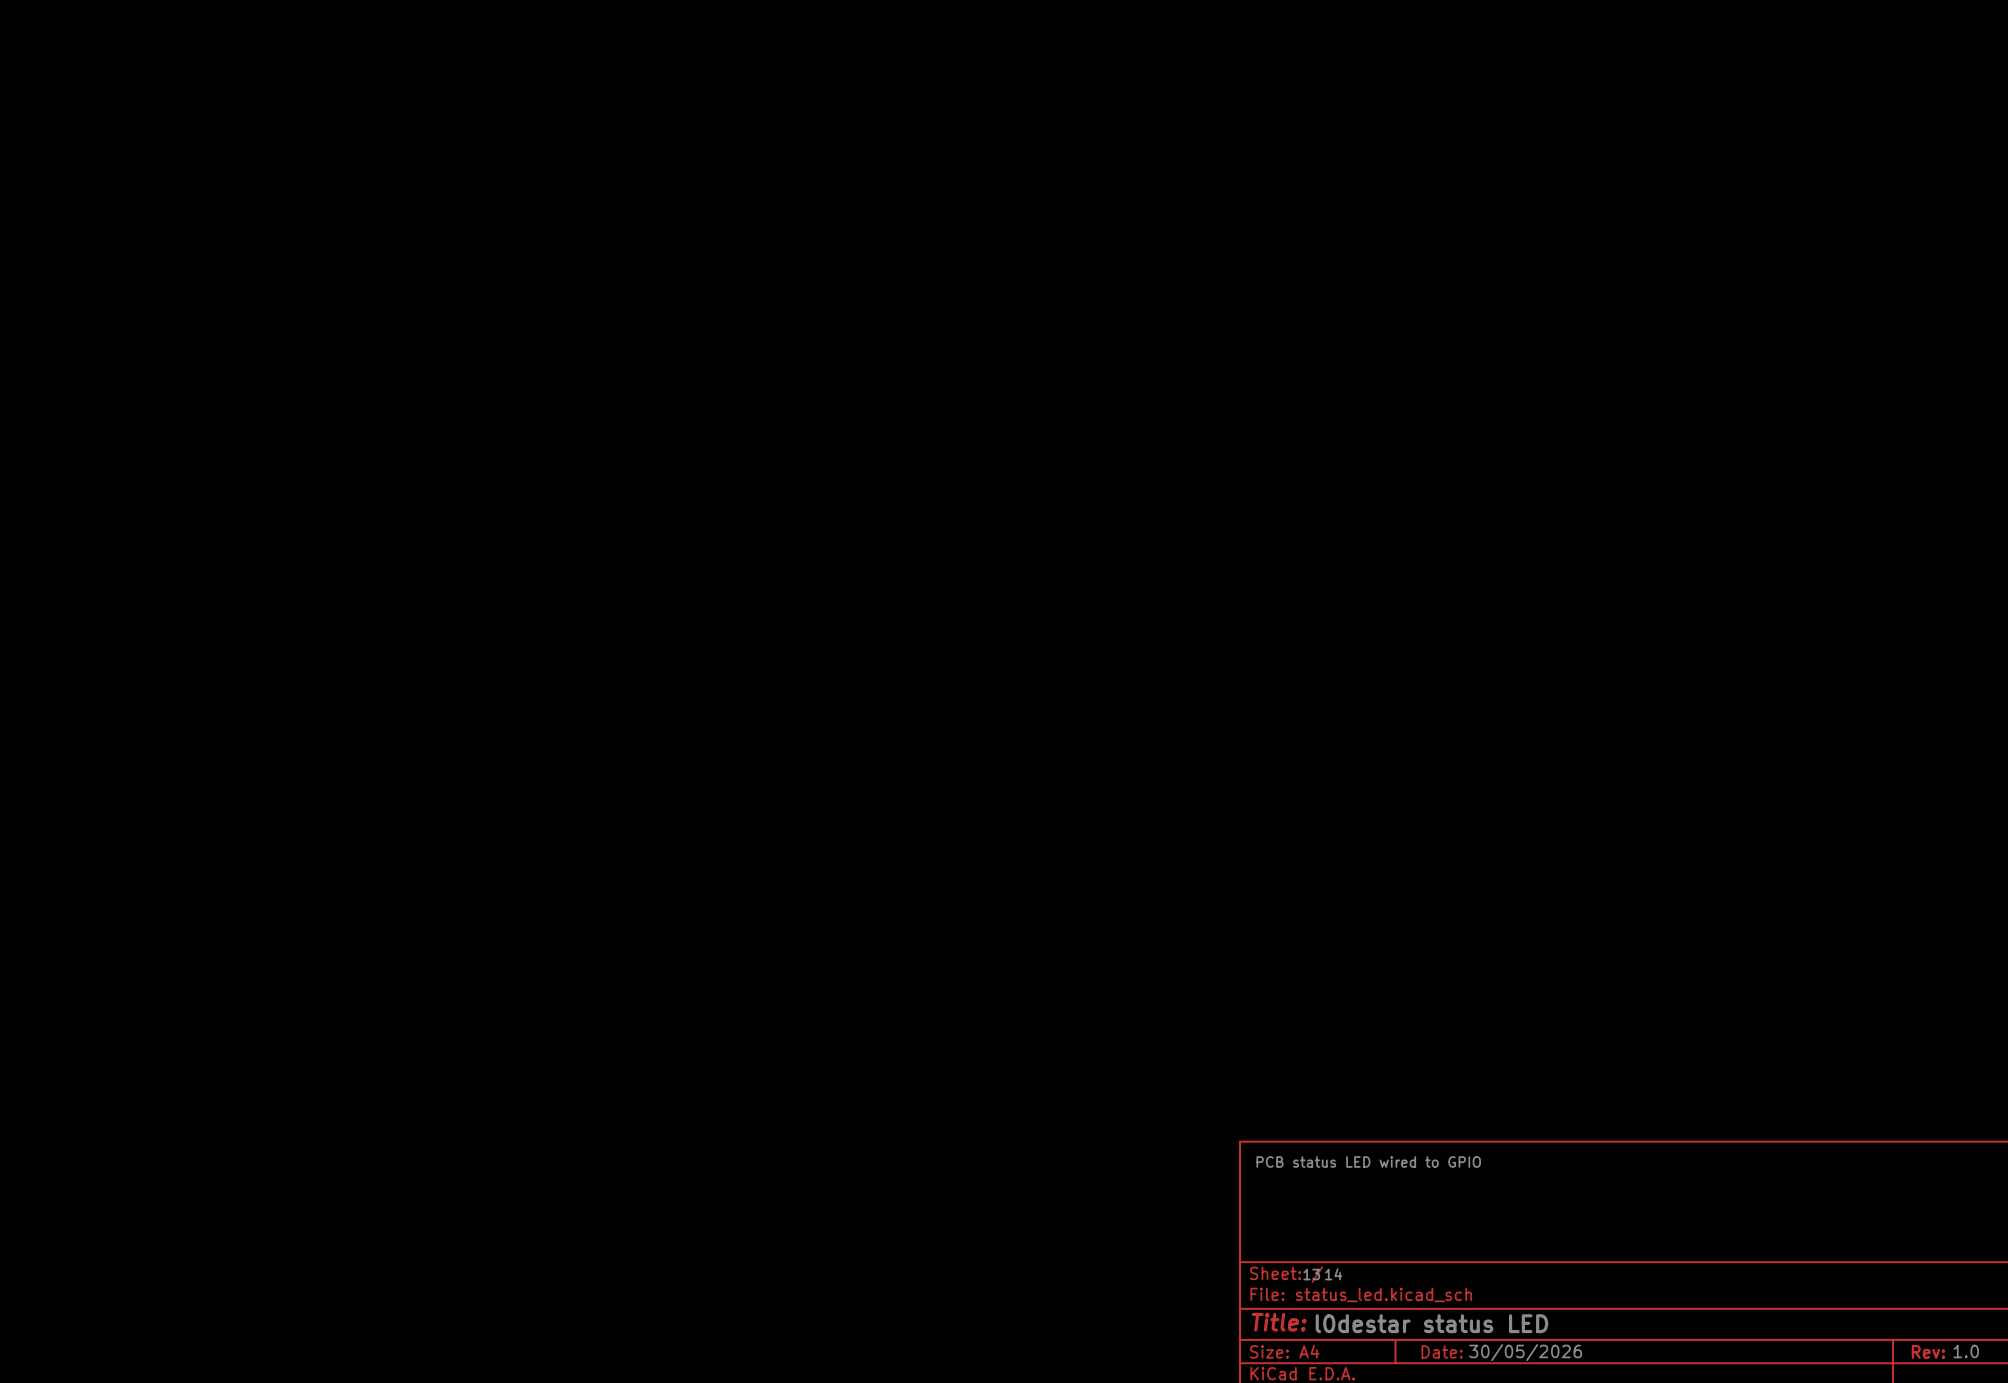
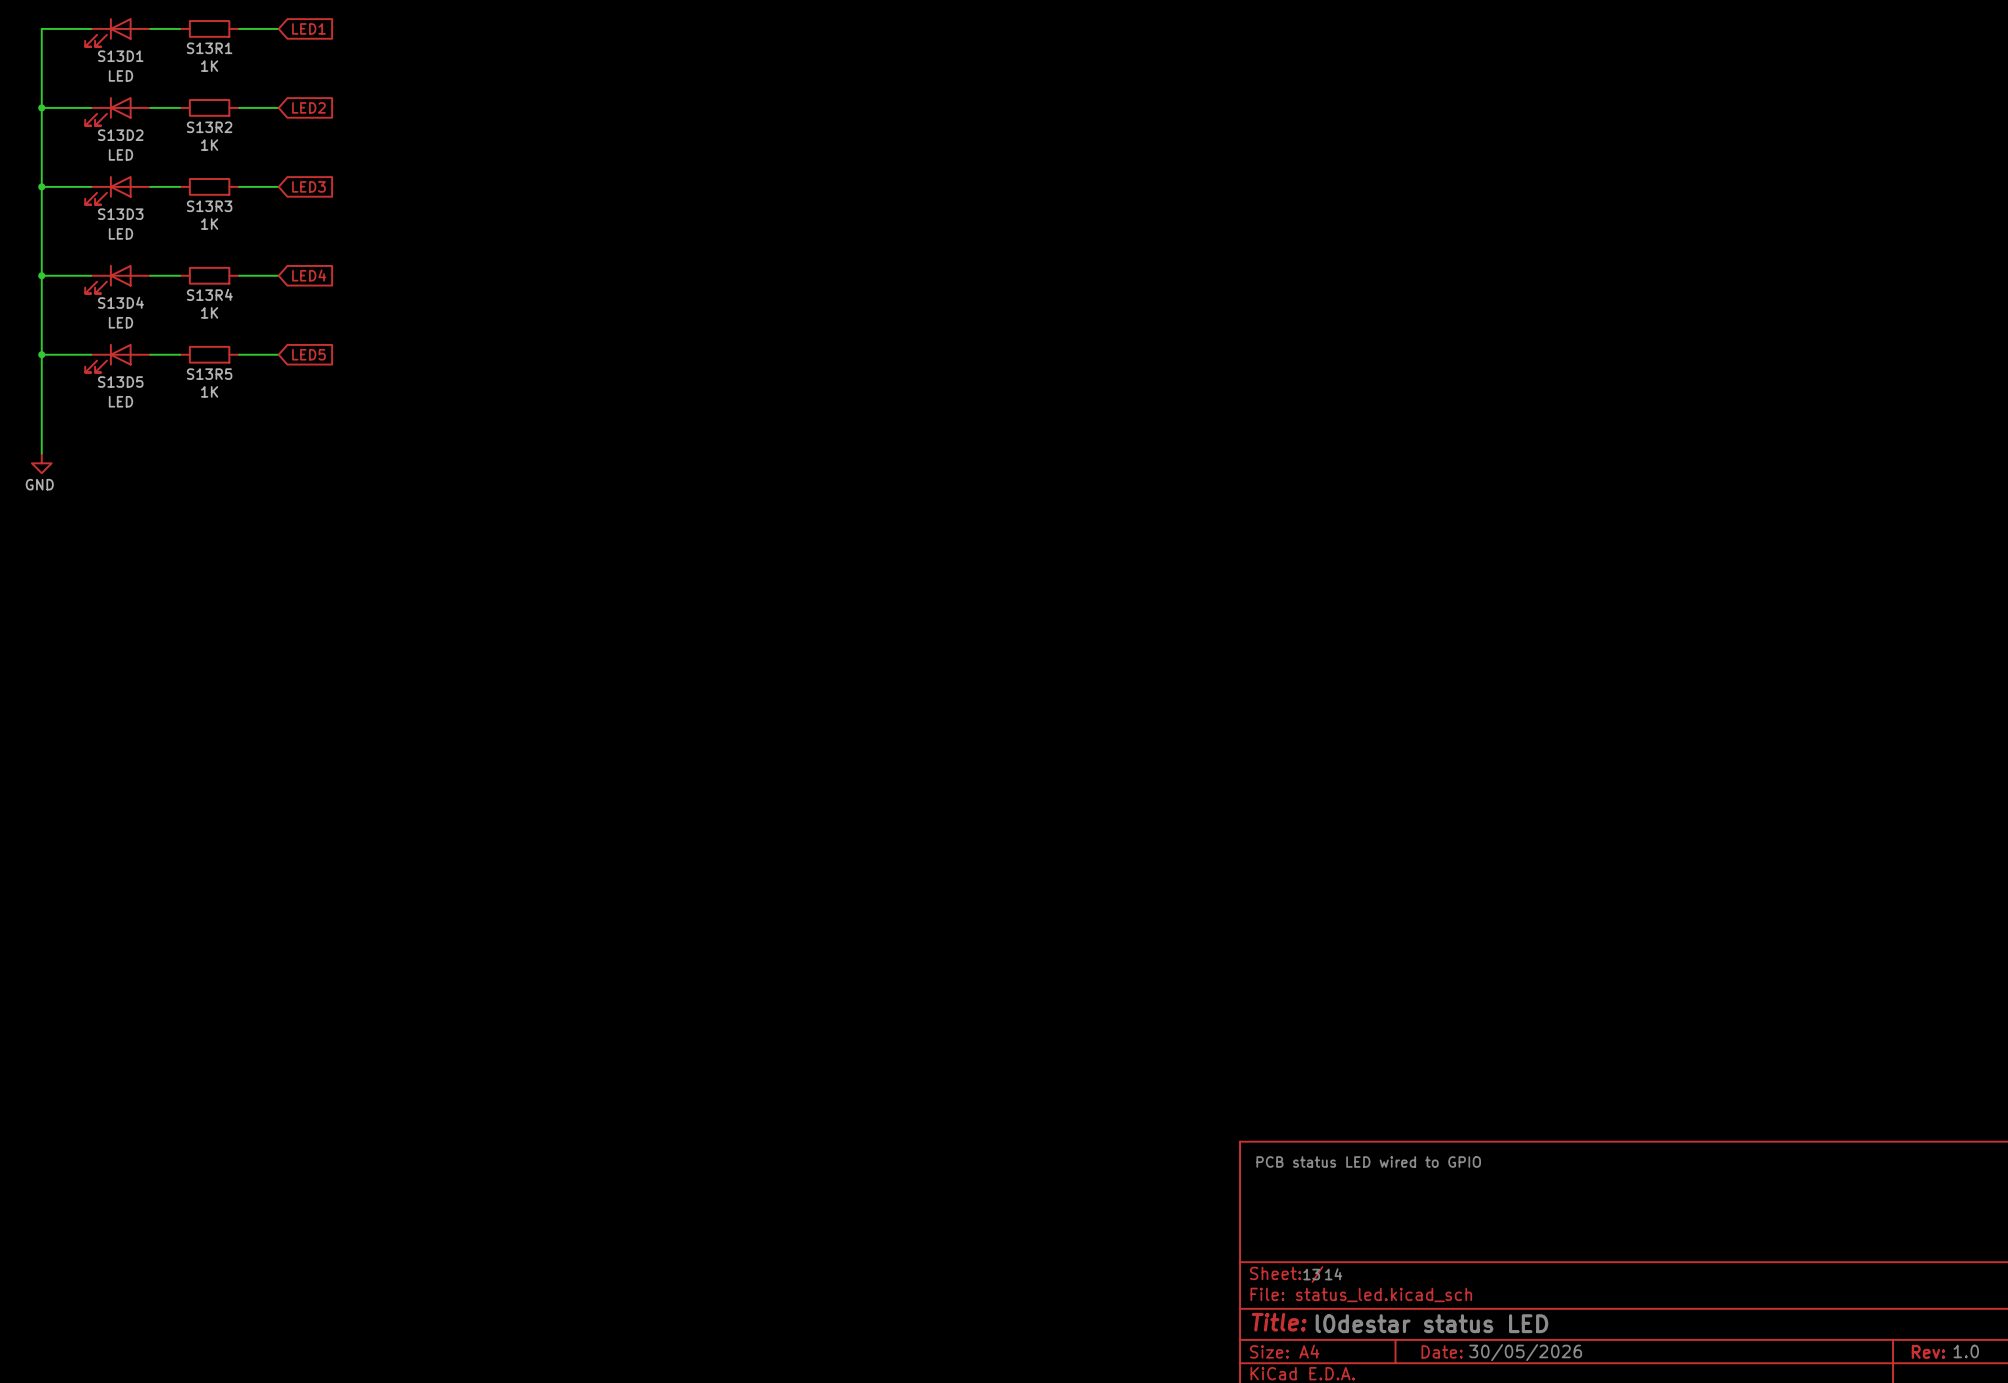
wire: none -> (91, 28) (41, 28) (41, 453)
wire: none -> (150, 28) (179, 28)
S13R1: none -> 1K (209, 28)
wire: none -> (239, 28) (278, 28)
global label: none -> LED1 (308, 28)
S13D1: none -> LED (117, 32)
wire: none -> (41, 107) (91, 107)
junction: none -> (41, 107)
wire: none -> (150, 107) (179, 107)
S13R2: none -> 1K (209, 107)
wire: none -> (239, 107) (278, 107)
global label: none -> LED2 (308, 107)
S13D2: none -> LED (117, 111)
wire: none -> (41, 186) (91, 186)
junction: none -> (41, 186)
wire: none -> (150, 186) (179, 186)
S13R3: none -> 1K (209, 186)
wire: none -> (239, 186) (278, 186)
global label: none -> LED3 (308, 186)
S13D3: none -> LED (117, 190)
wire: none -> (41, 275) (91, 275)
junction: none -> (41, 275)
wire: none -> (150, 275) (179, 275)
S13R4: none -> 1K (209, 275)
wire: none -> (239, 275) (278, 275)
global label: none -> LED4 (309, 275)
S13D4: none -> LED (117, 279)
wire: none -> (41, 354) (91, 354)
junction: none -> (41, 354)
wire: none -> (150, 354) (179, 354)
S13R5: none -> 1K (209, 354)
wire: none -> (239, 354) (278, 354)
global label: none -> LED5 (308, 354)
S13D5: none -> LED (117, 358)
power symbol: none -> GND (41, 463)

